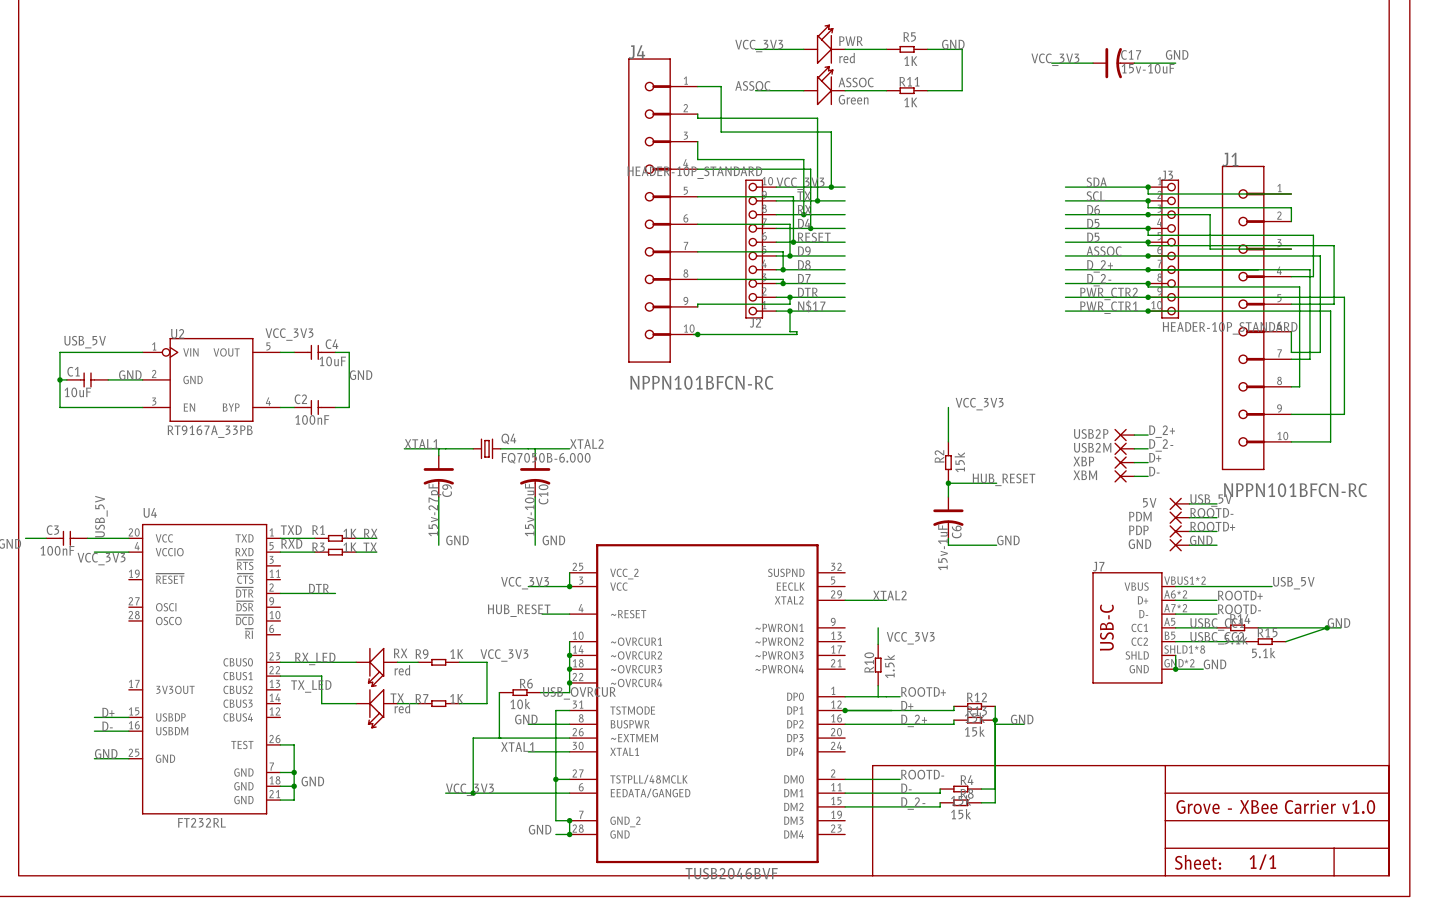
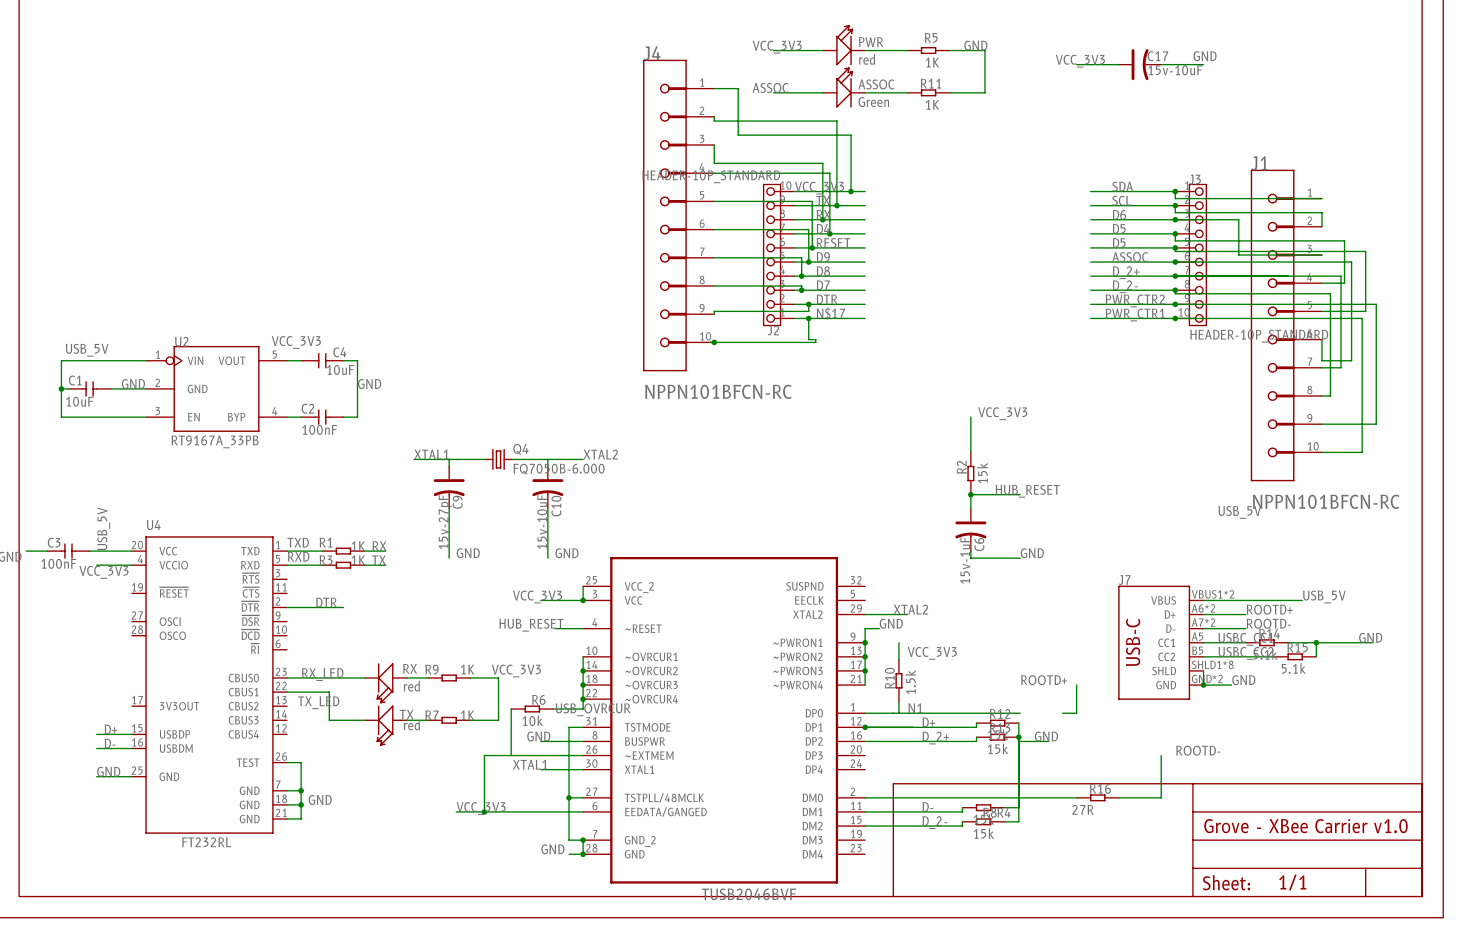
label: D_2+ (1162, 431) -> none
USB2P: (1124, 435) -> none
wire: (1134, 435) (1148, 435) -> none
label: D_2- (1161, 445) -> none
USB2M: (1124, 448) -> none
wire: (1134, 448) (1148, 448) -> none
label: D+ (1155, 457) -> none
XBP: (1124, 462) -> none
wire: (1134, 462) (1148, 462) -> none
label: D- (1154, 471) -> none
XBM: (1124, 476) -> none
wire: (1134, 476) (1148, 476) -> none
5V: (1179, 503) -> none
wire: (1189, 503) (1217, 503) -> none
label: ROOTD- (1211, 512) -> none
PDM: (1179, 517) -> none
wire: (1189, 517) (1217, 517) -> none
label: ROOTD+ (1212, 526) -> none
PDP: (1179, 531) -> none
wire: (1189, 531) (1217, 531) -> none
label: GND (1201, 540) -> none
GND: (1179, 545) -> none
wire: (1189, 545) (1217, 545) -> none
label: none -> GND (891, 623)
wire: none -> (879, 628) (865, 628) (865, 685)
junction: none -> (865, 642)
junction: none -> (1316, 642)
wire: (1327, 627) (1285, 641) -> (1316, 642) (1316, 656)
junction: (1327, 627) -> none
junction: none -> (865, 656)
junction: none -> (865, 670)
wire: none -> (1076, 685) (1076, 713) (1062, 713)
label: none -> N1 (915, 708)
label position: ROOTD+ (923, 691) -> ROOTD+ (1044, 680)
wire: none -> (921, 713) (1020, 713)
label: none -> ROOTD- (1198, 750)
wire: none -> (1161, 755) (1161, 797) (1118, 797)
label: ROOTD- (922, 774) -> none
wire: none -> (921, 797) (1076, 797)
R16: none -> 27R (1097, 797)
R4 name position: R4 (967, 780) -> R4 (1004, 812)

